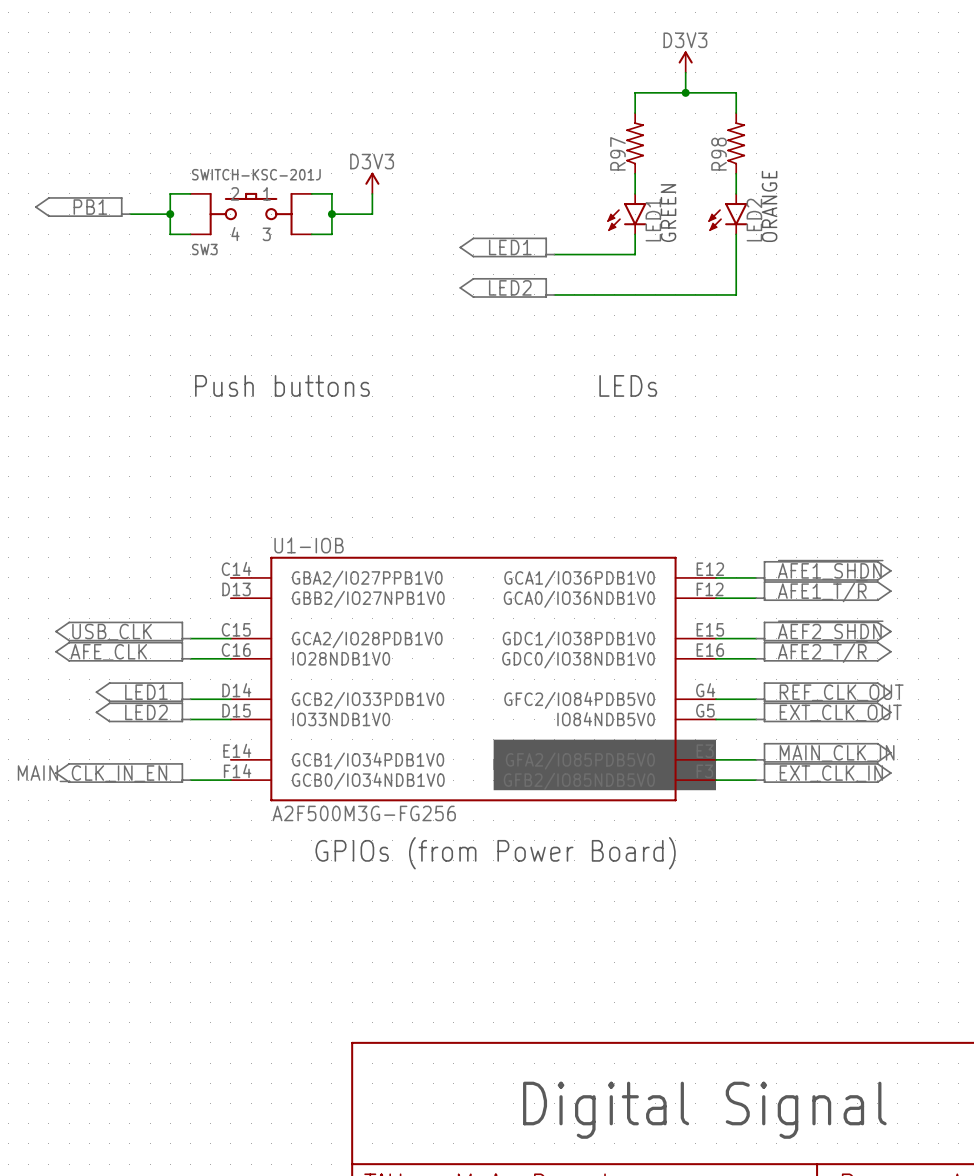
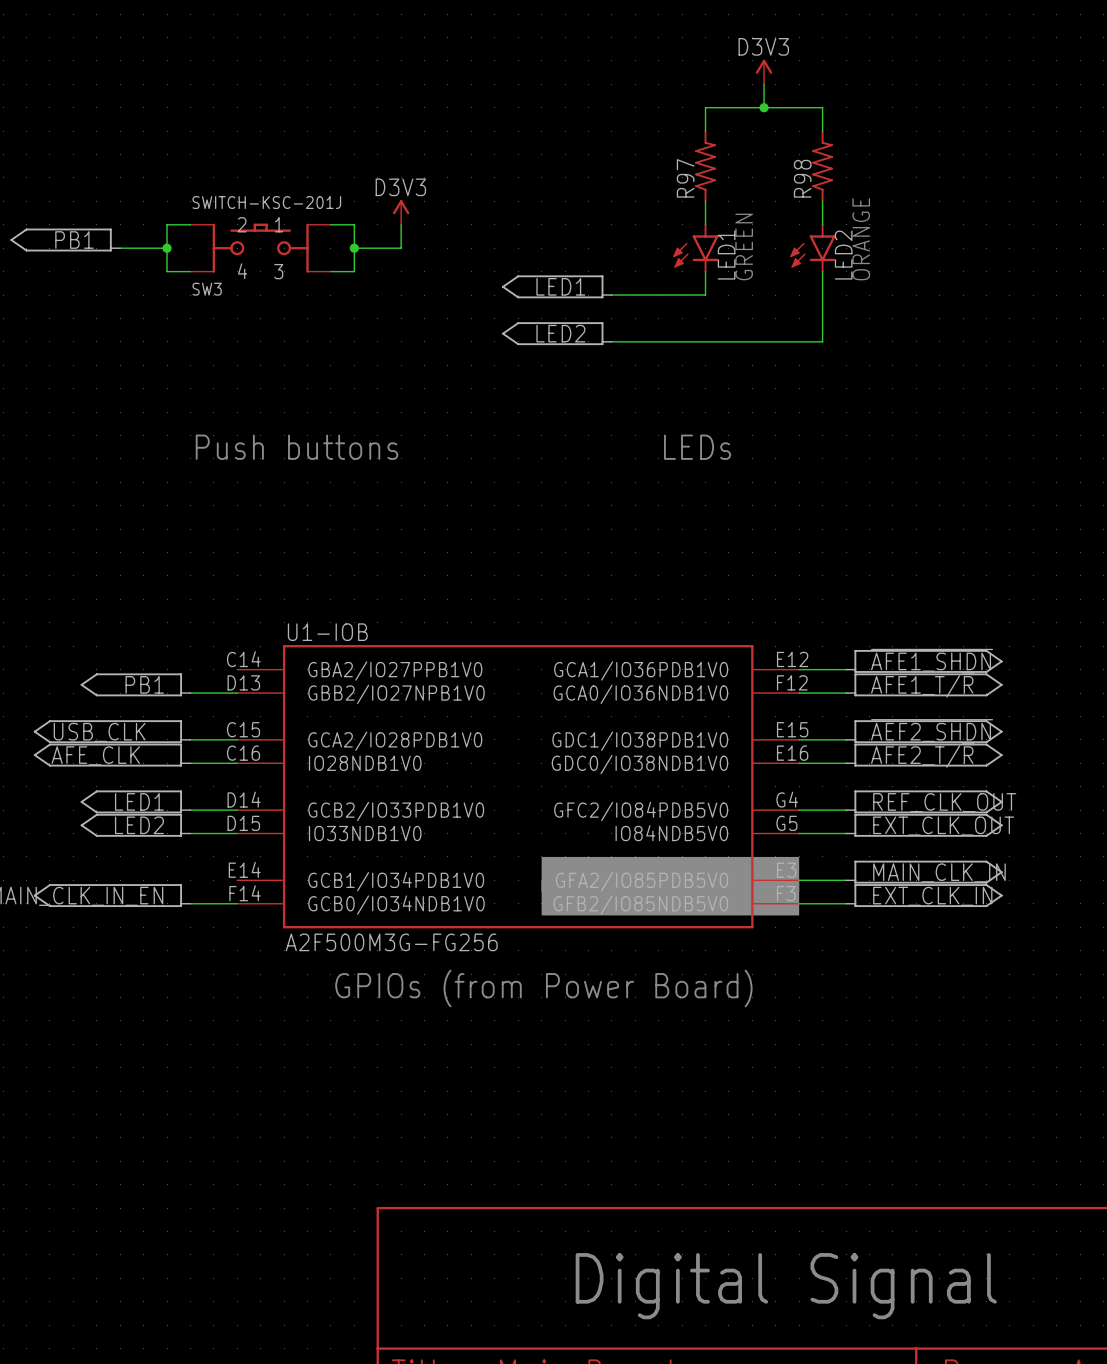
part: none -> (135, 684)
label: none -> PB1 (144, 684)
wire: none -> (190, 693) (237, 693)

